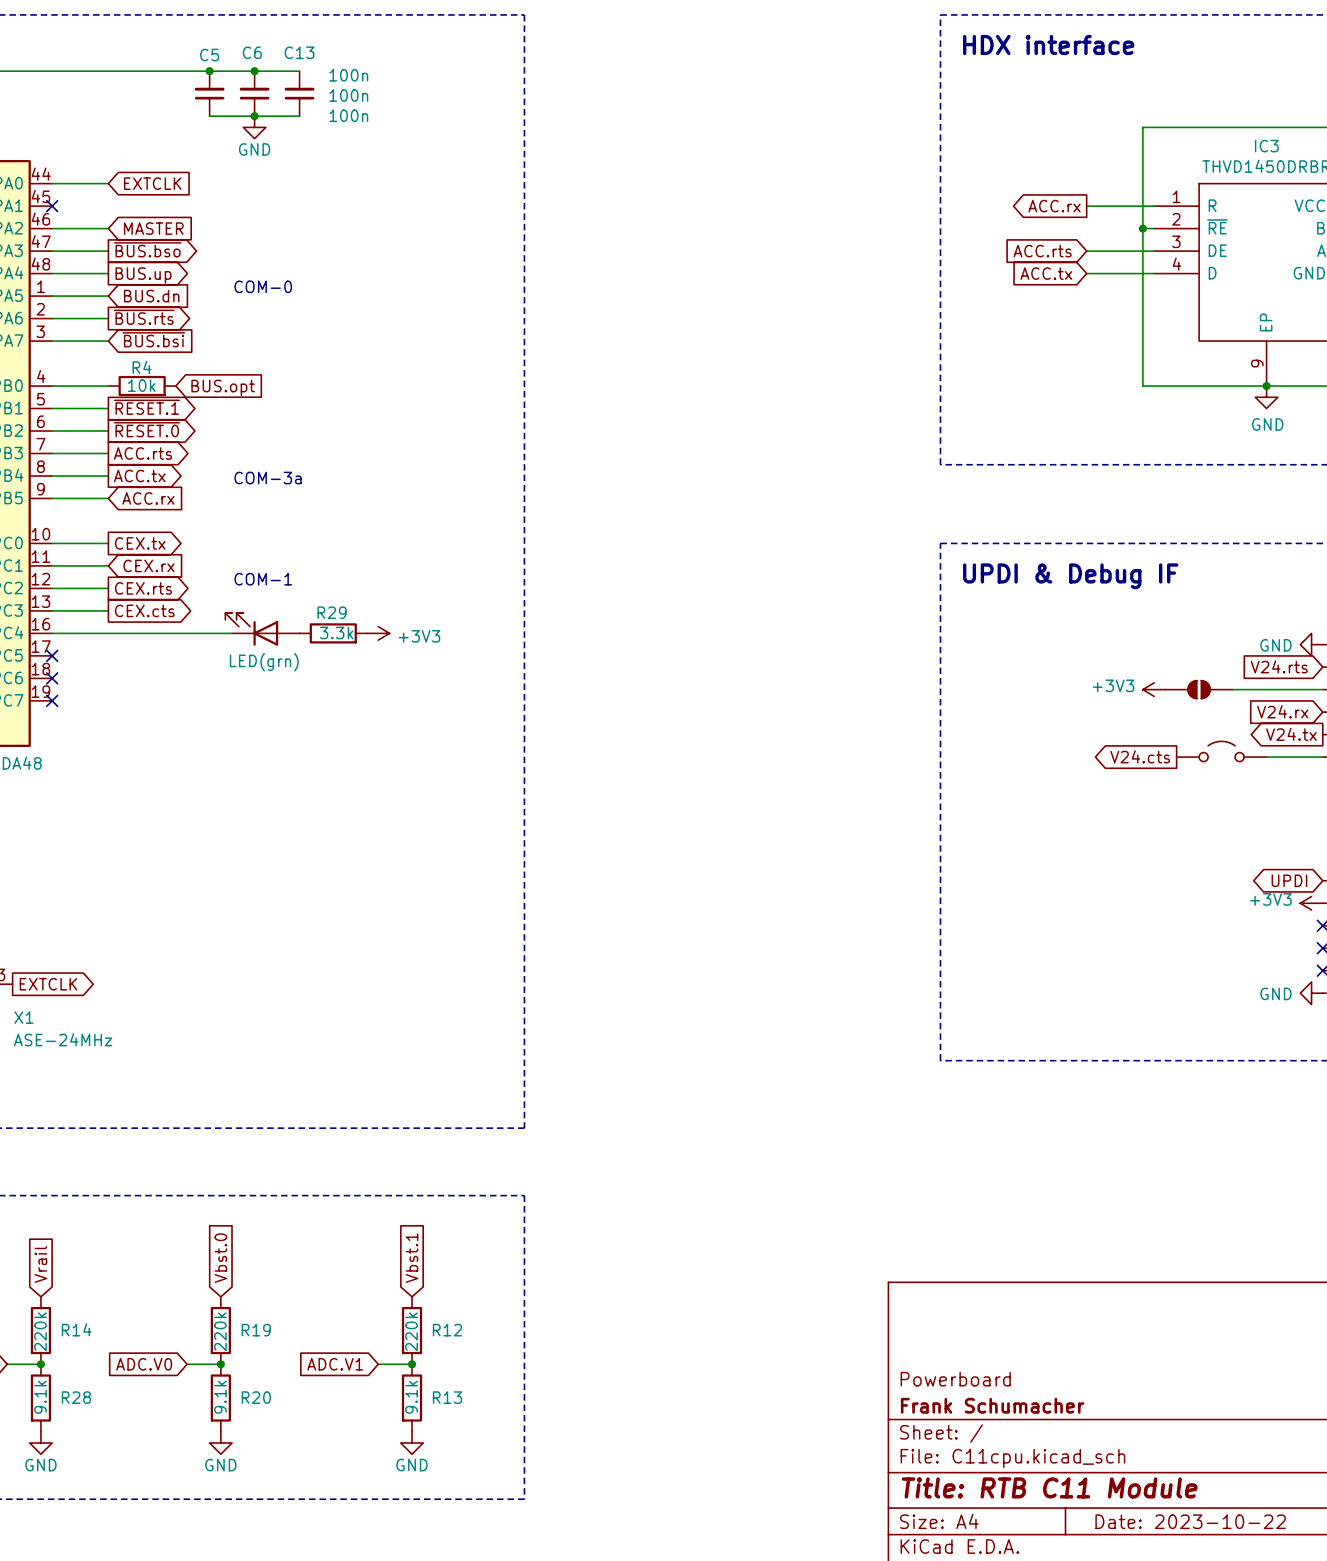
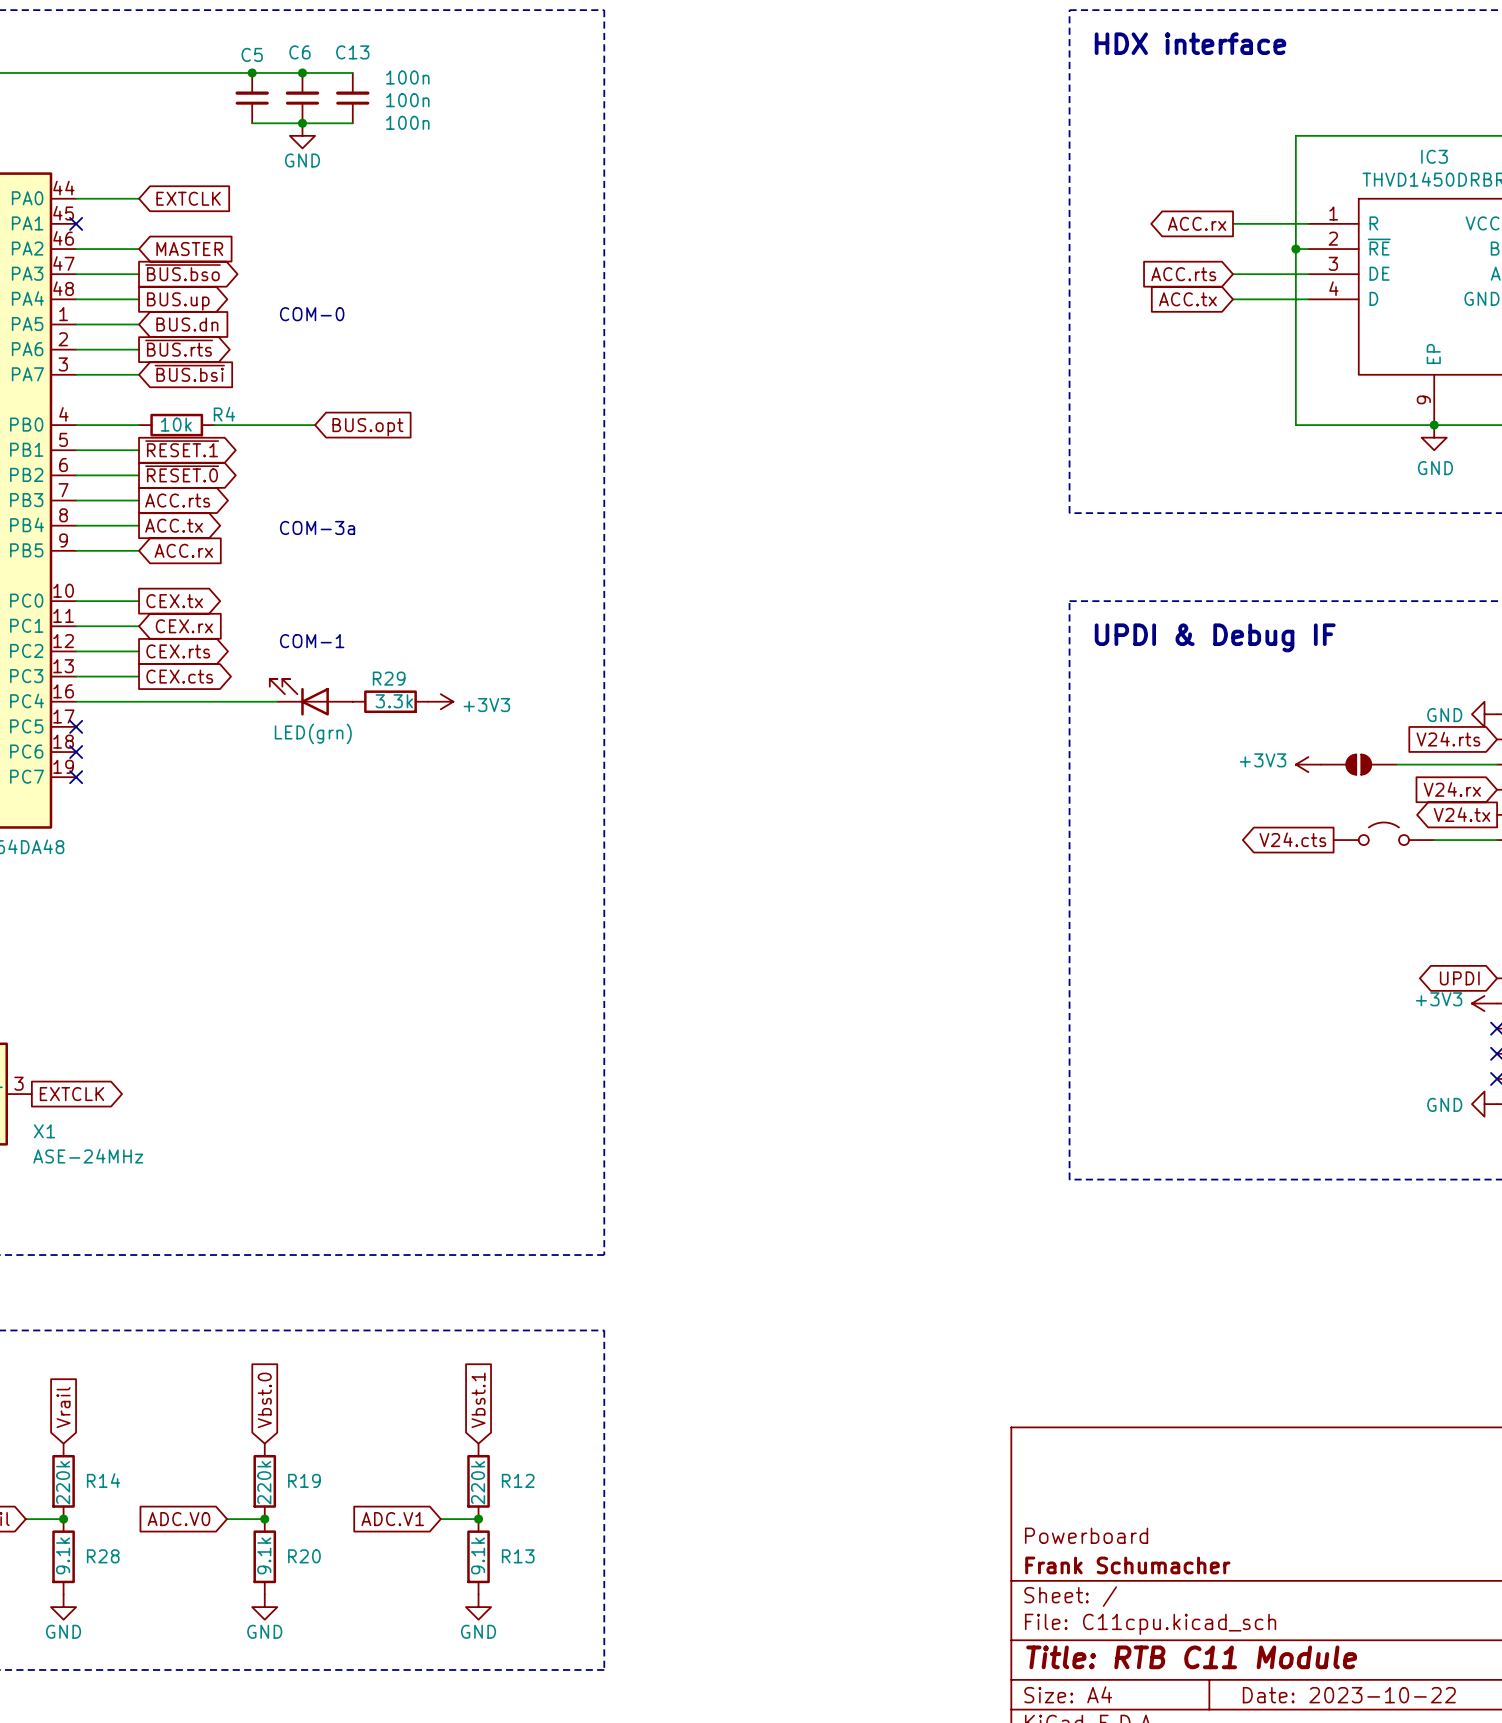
R4 name position: R4 (142, 367) -> R4 (224, 414)
wire: none -> (214, 425) (315, 425)
global label position: BUS.opt (223, 387) -> BUS.opt (367, 427)

